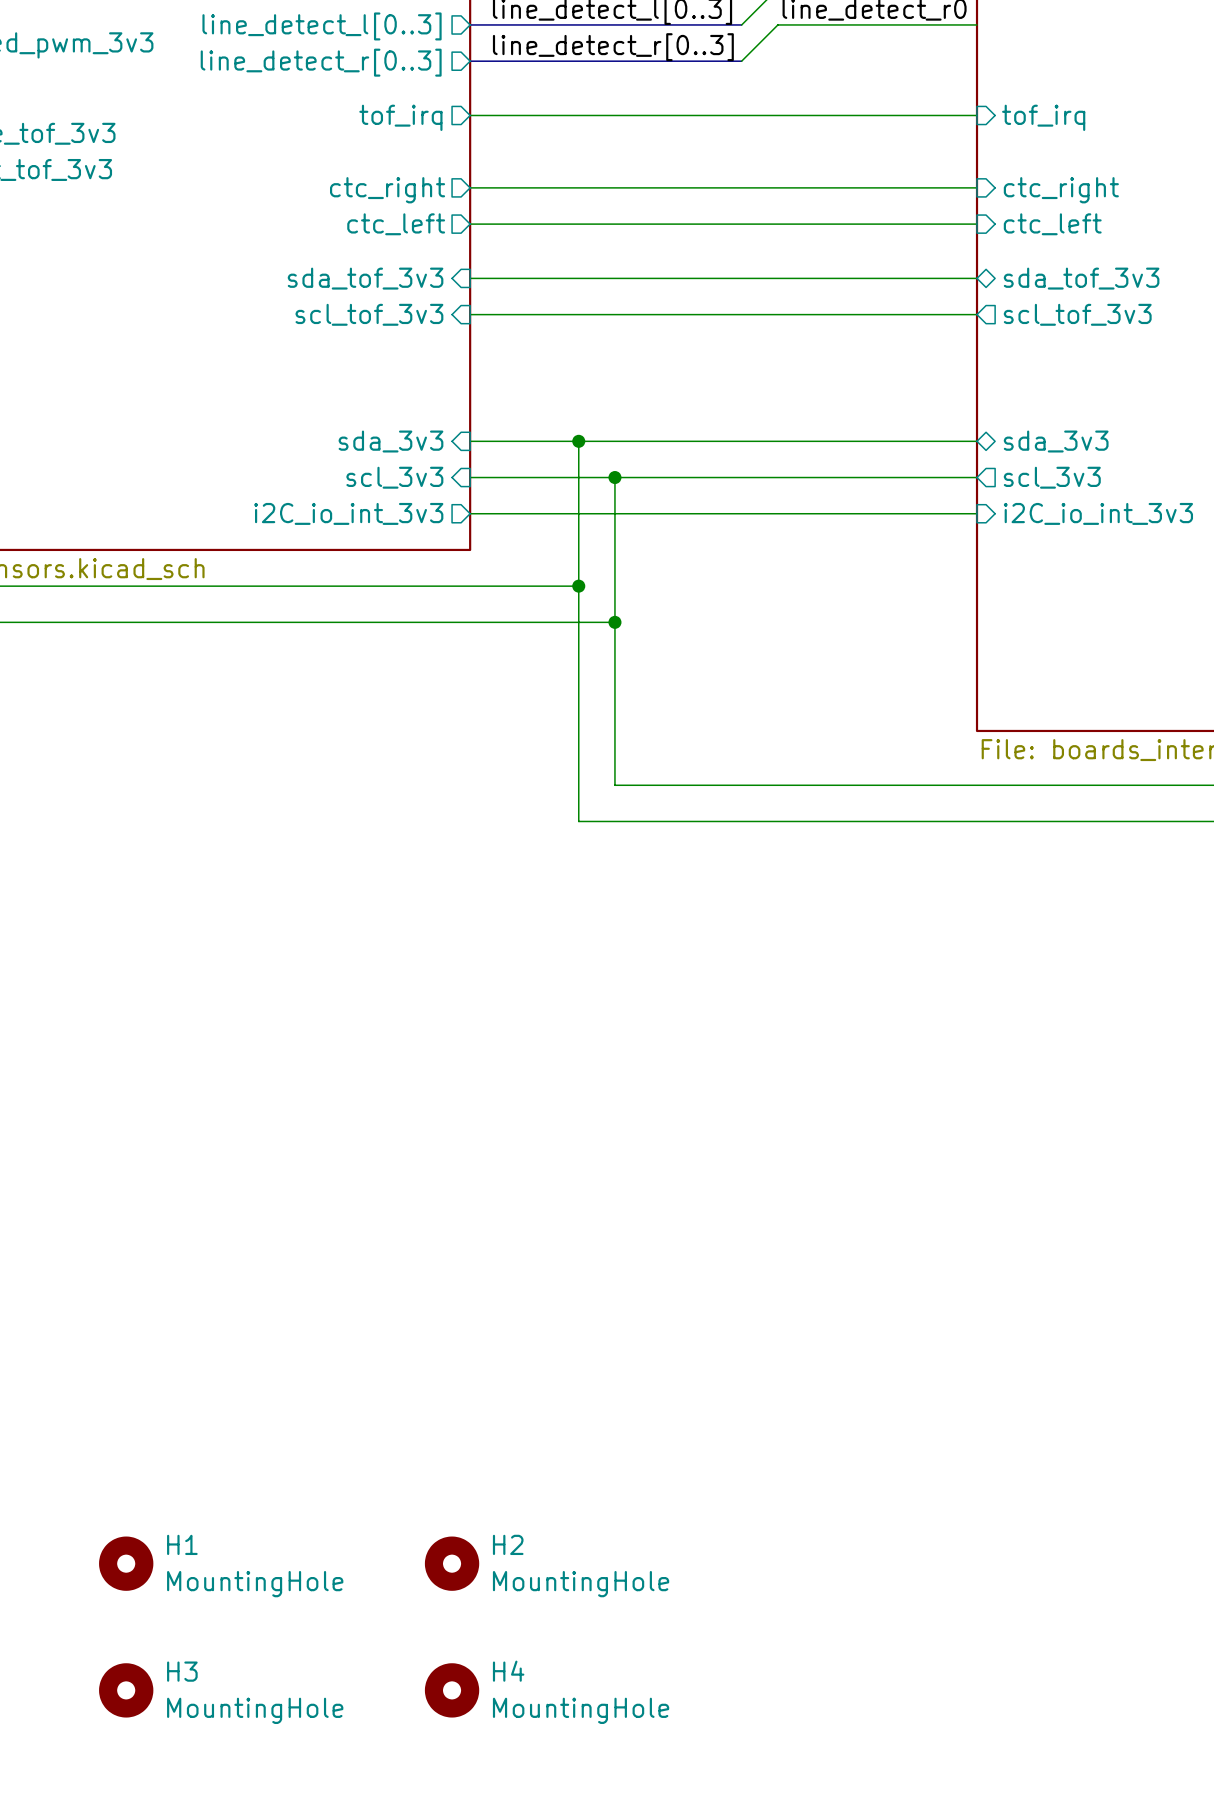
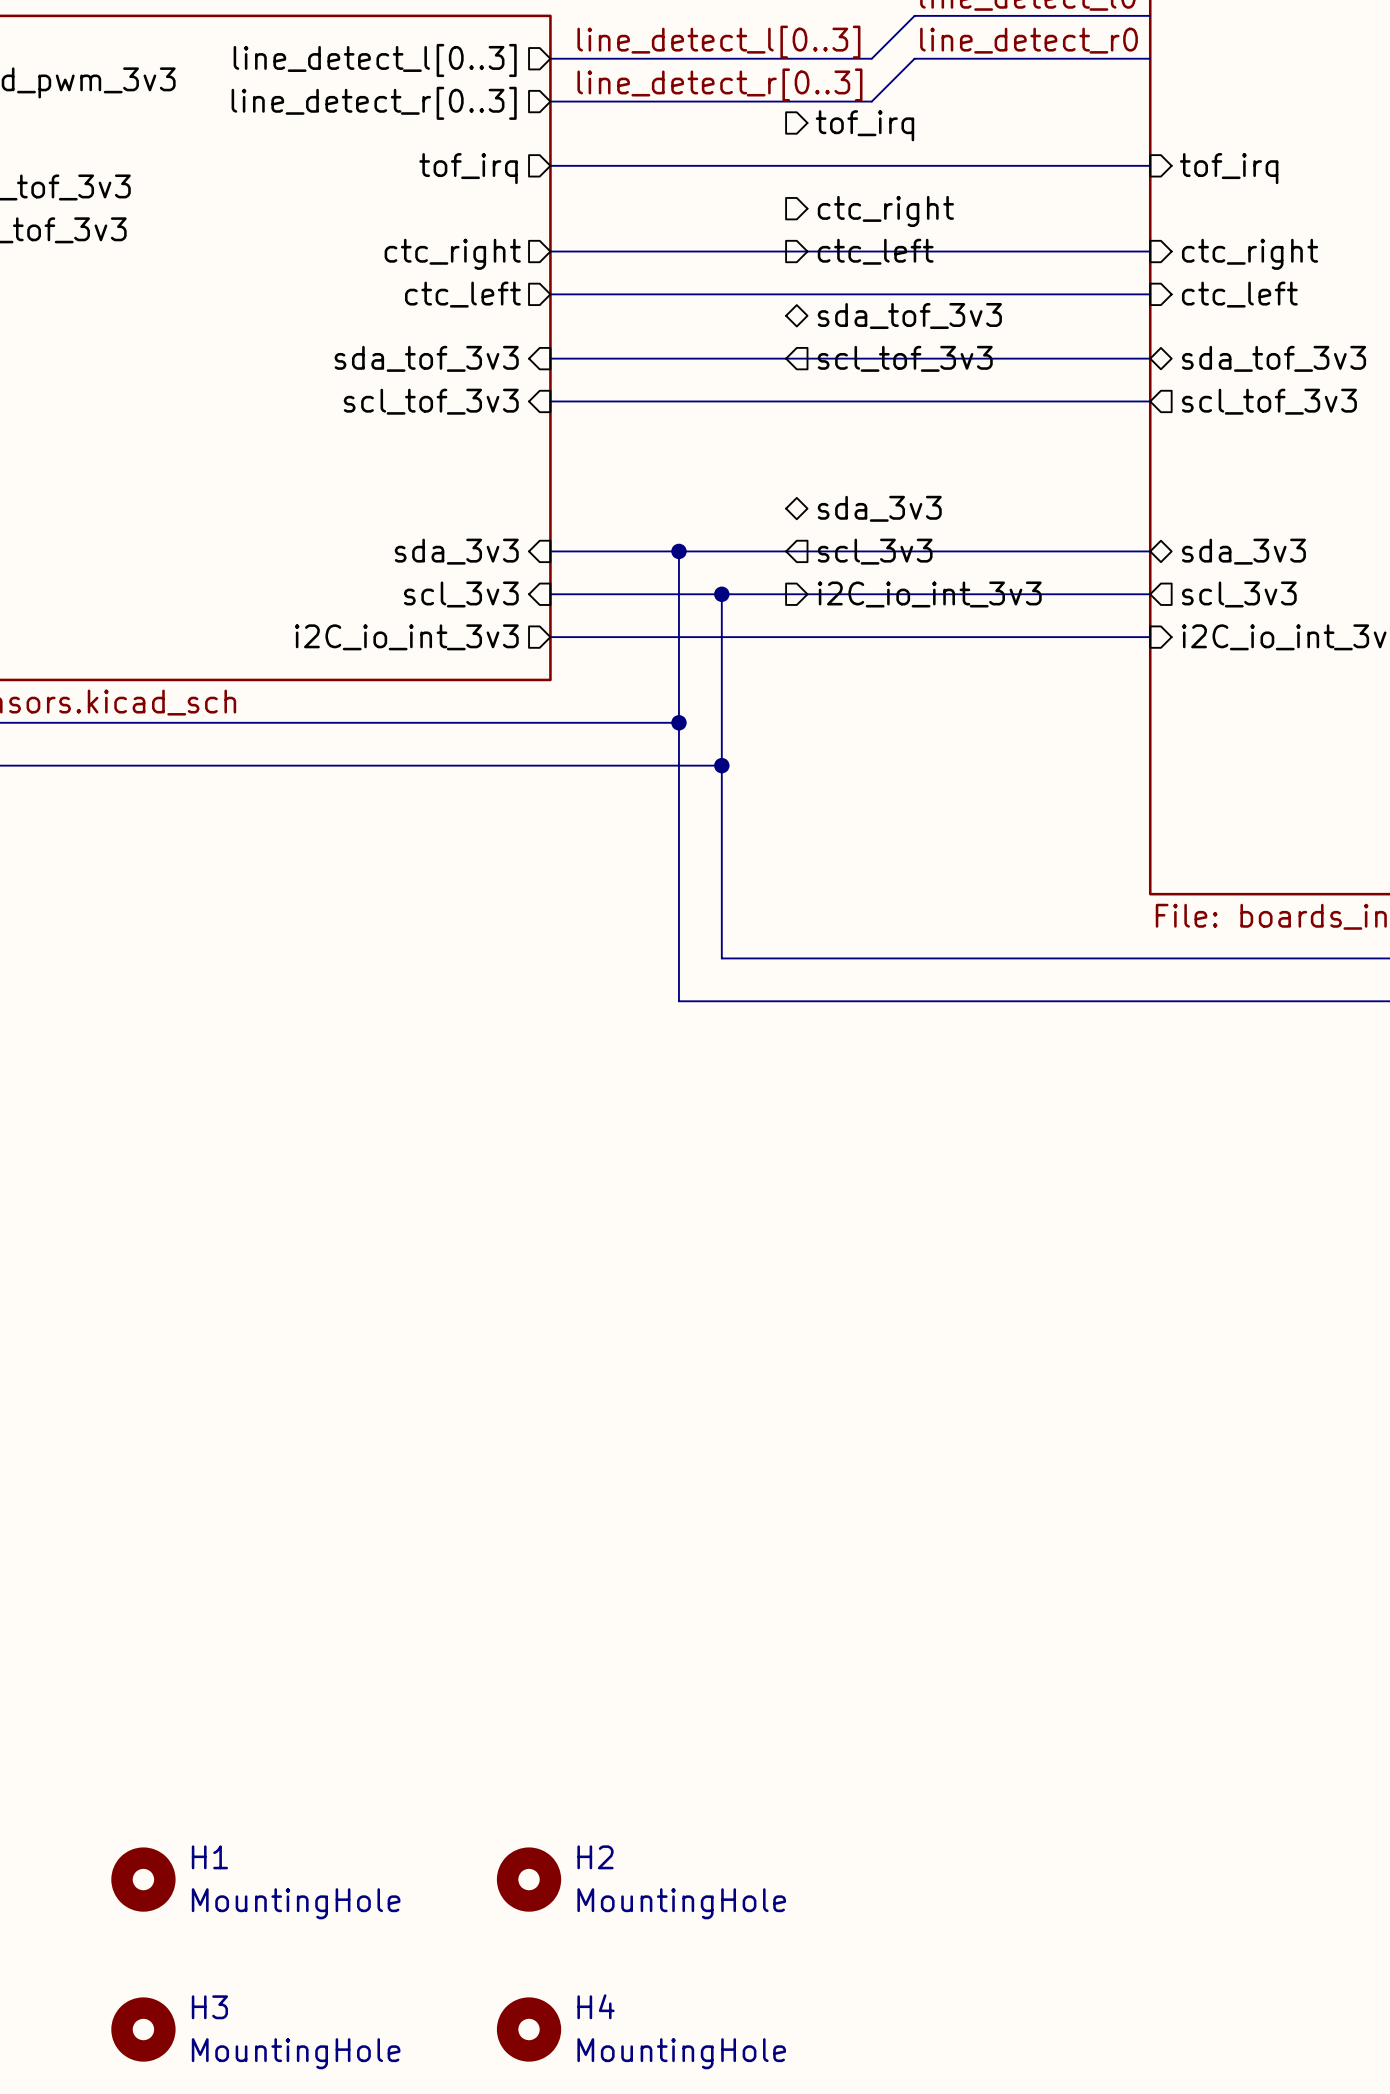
sheet pin: none -> tof_irq (864, 125)
sheet pin: none -> ctc_right (885, 211)
sheet pin: none -> ctc_left (875, 251)
sheet pin: none -> sda_tof_3v3 (909, 316)
sheet pin: none -> scl_tof_3v3 (905, 358)
sheet pin: none -> sda_3v3 (879, 508)
sheet pin: none -> scl_3v3 (875, 551)
sheet pin: none -> i2C_io_int_3v3 (929, 594)

